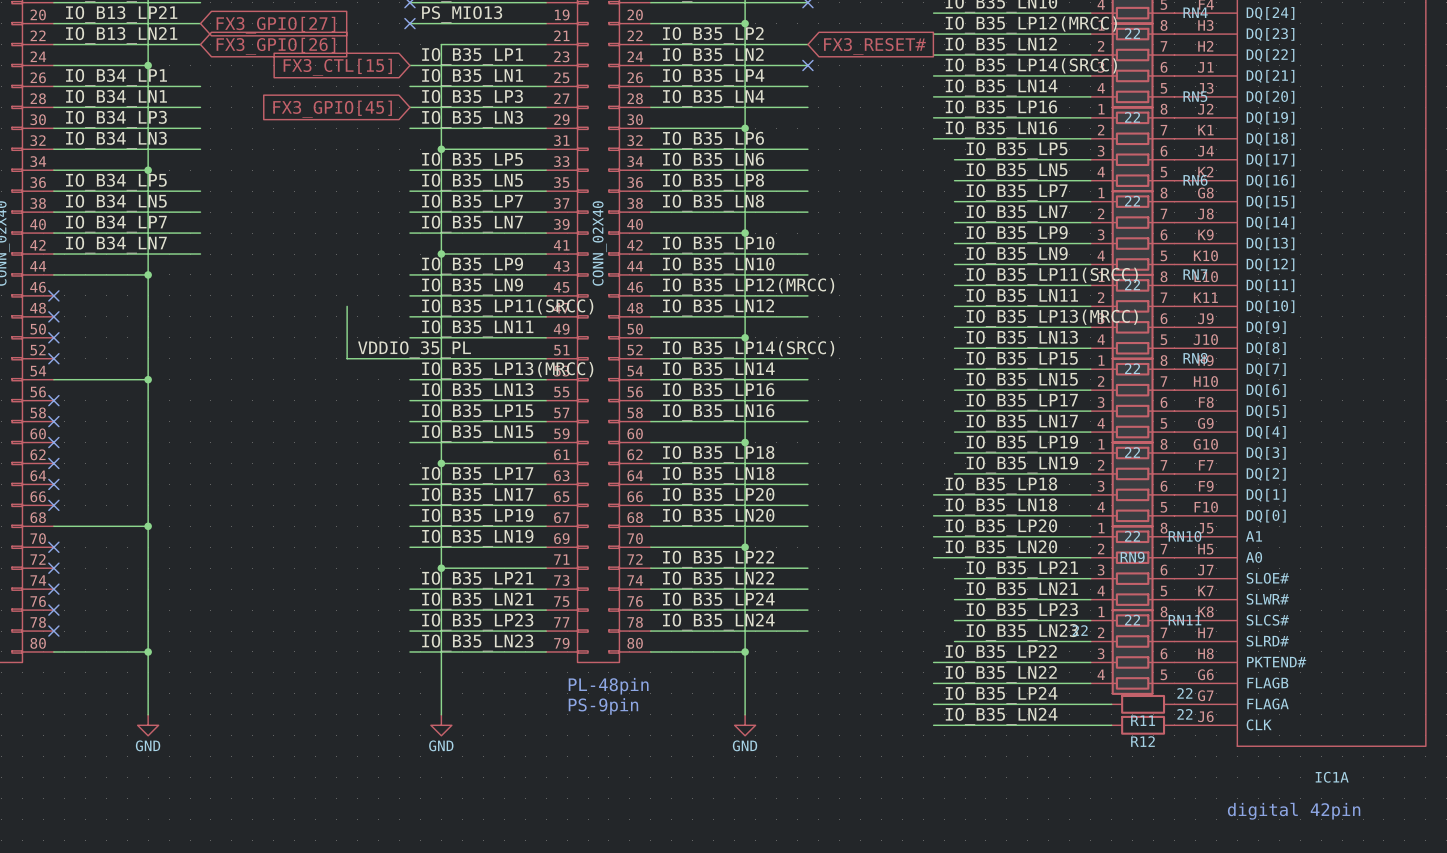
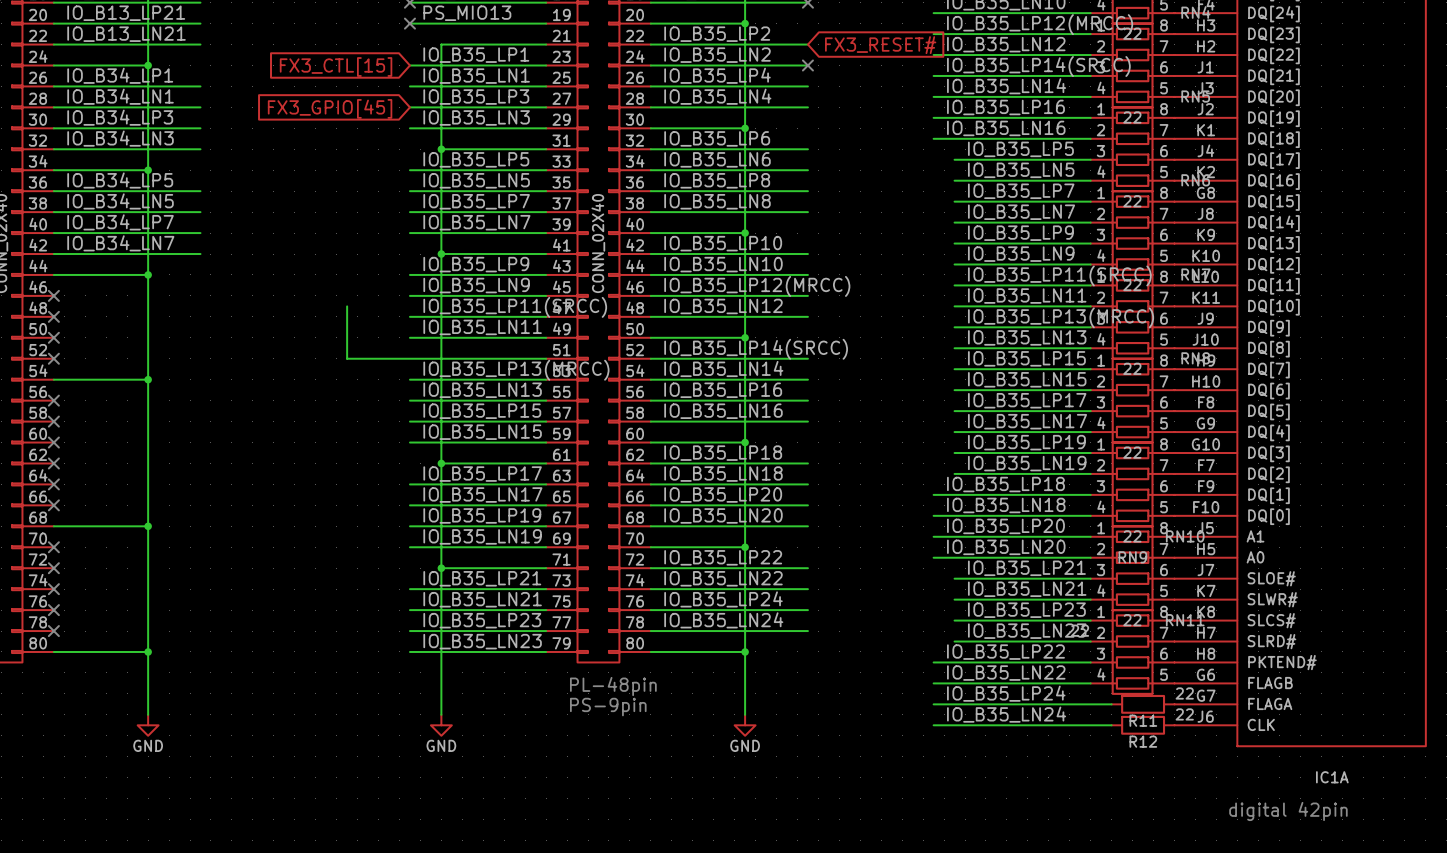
global label: FX3_GPIO[27] (275, 25) -> none
global label: FX3_GPIO[26] (275, 46) -> none
label: VDDIO_35_PL (414, 349) -> none

